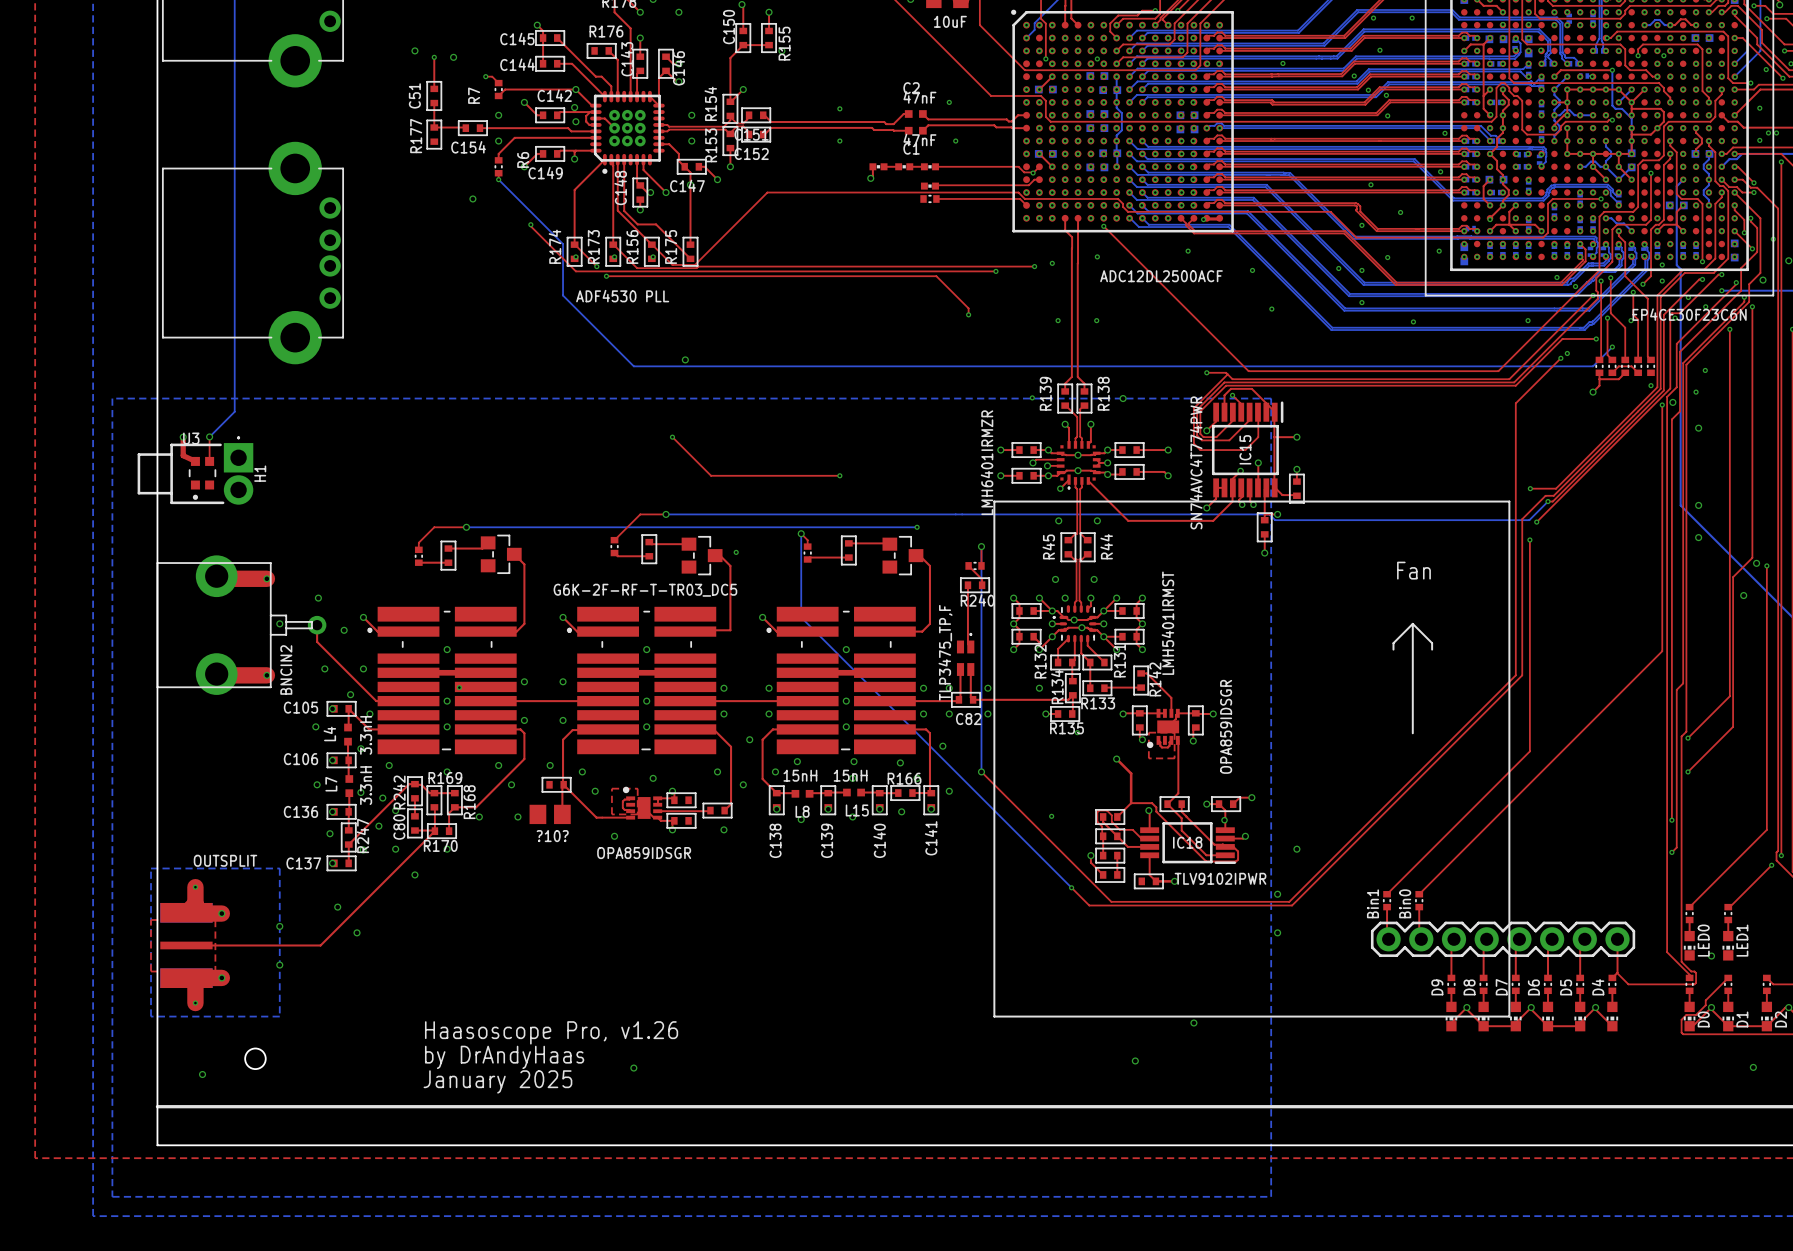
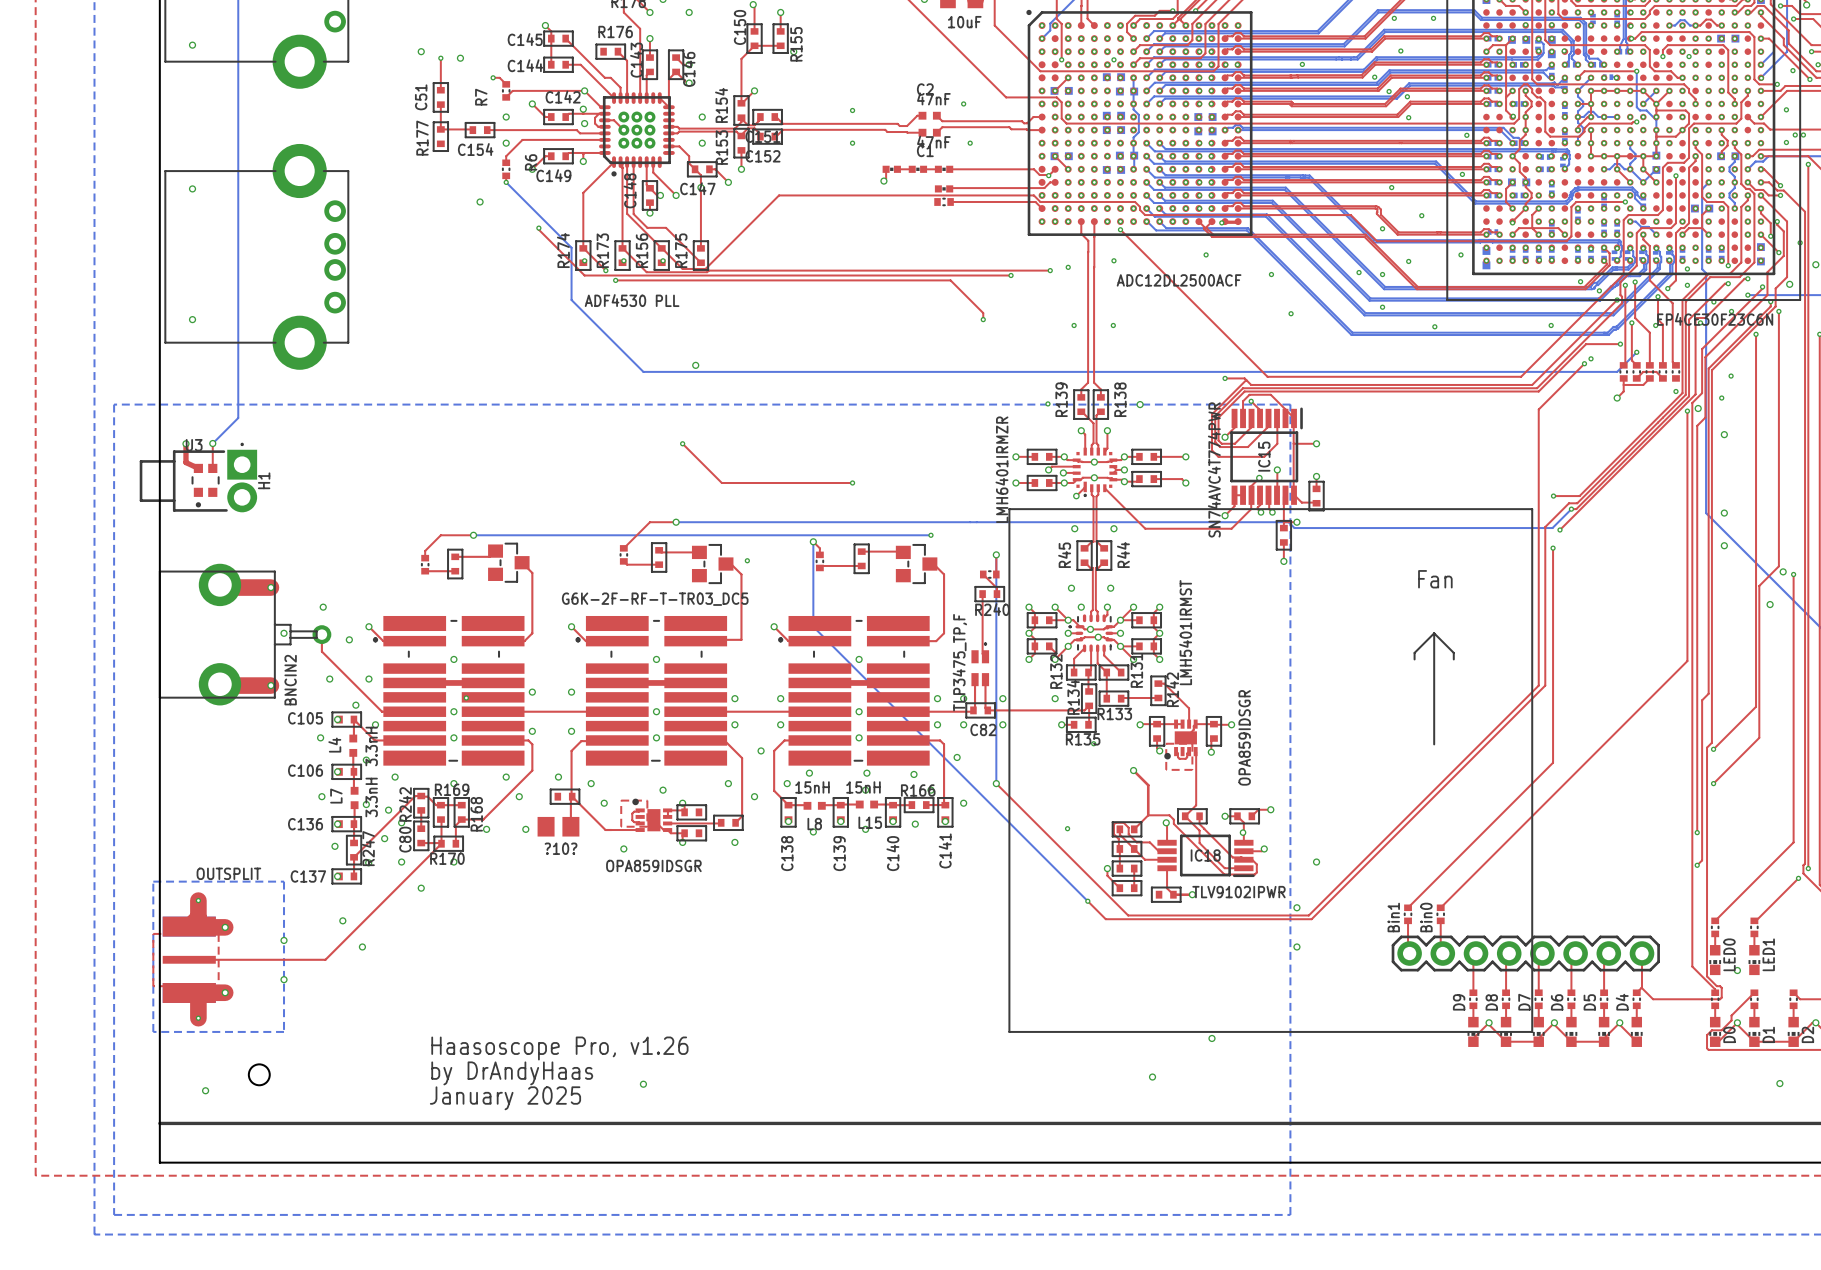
via: none -> (192, 45)
via: none -> (192, 188)
via: none -> (192, 319)

